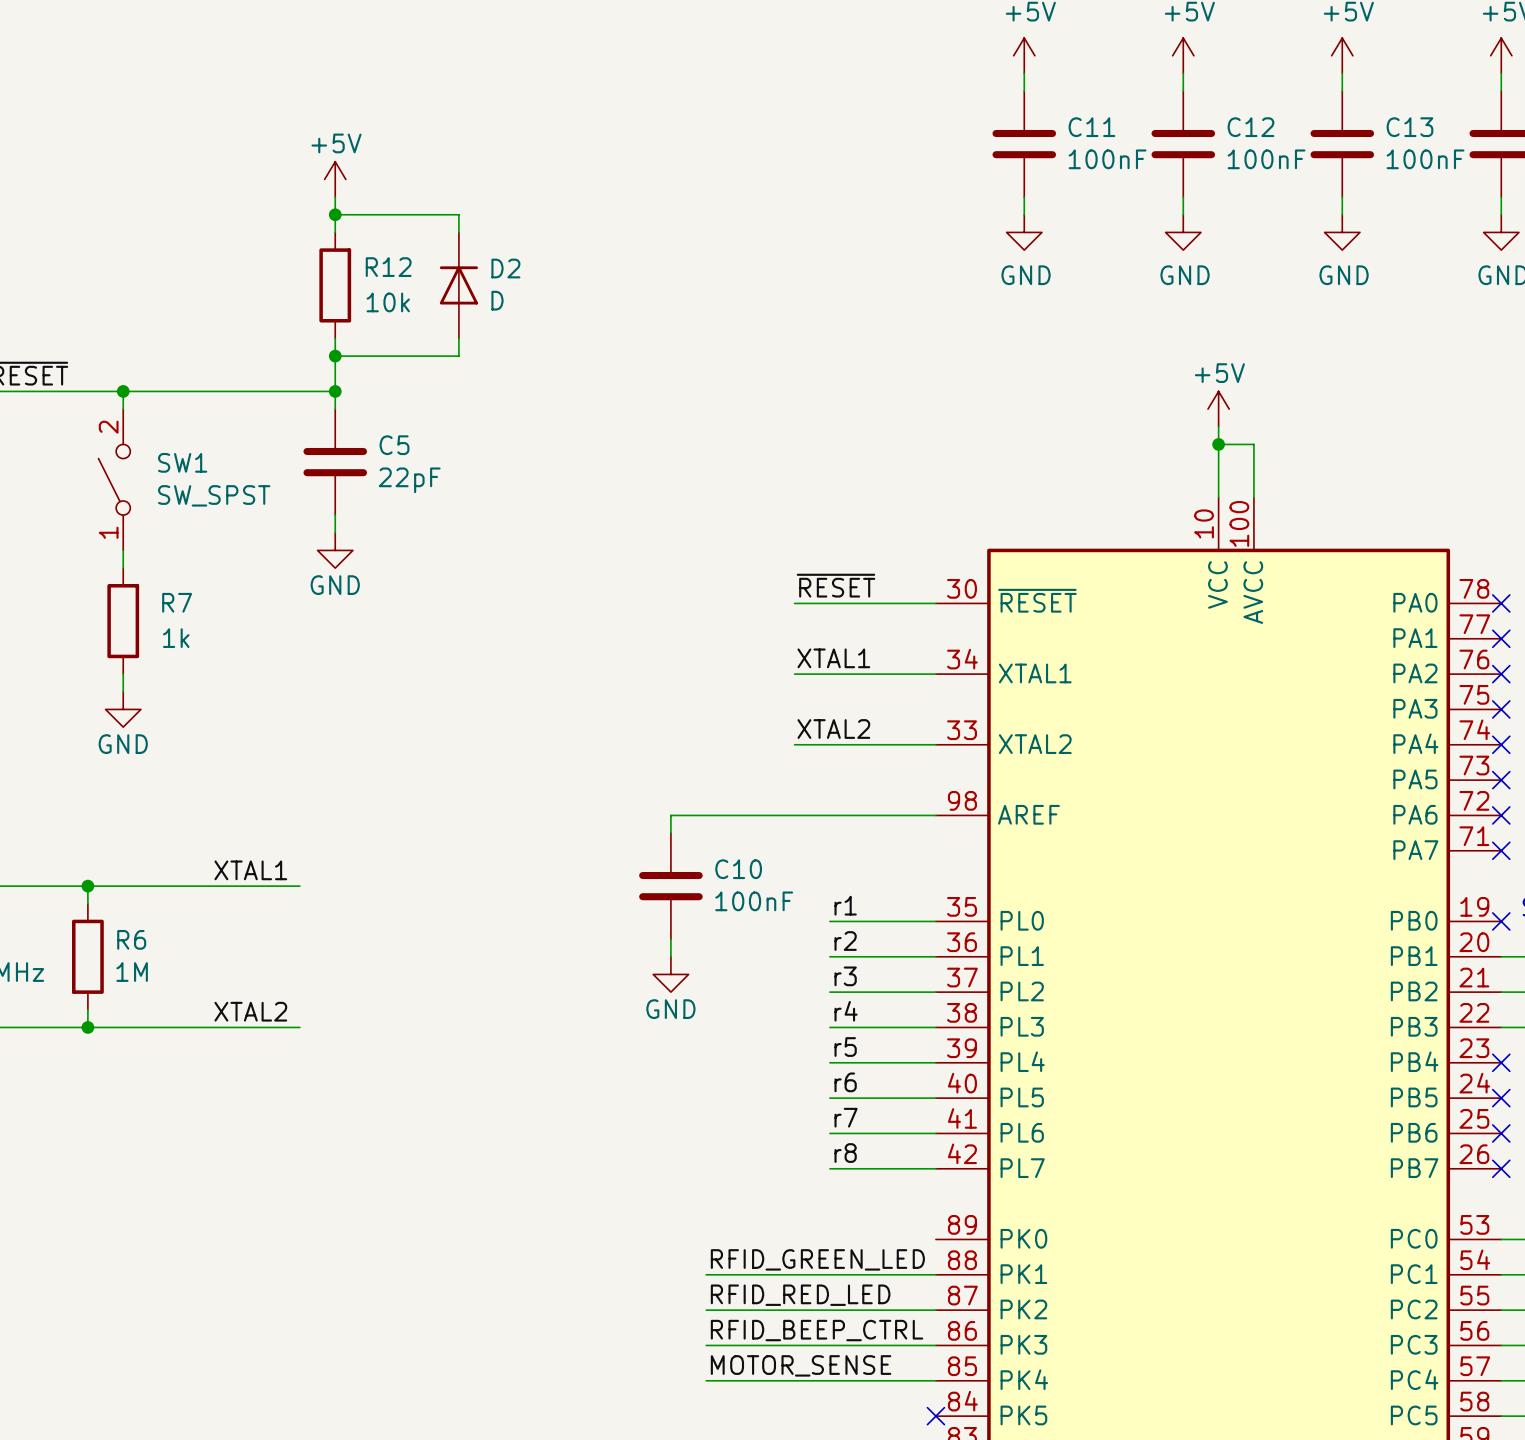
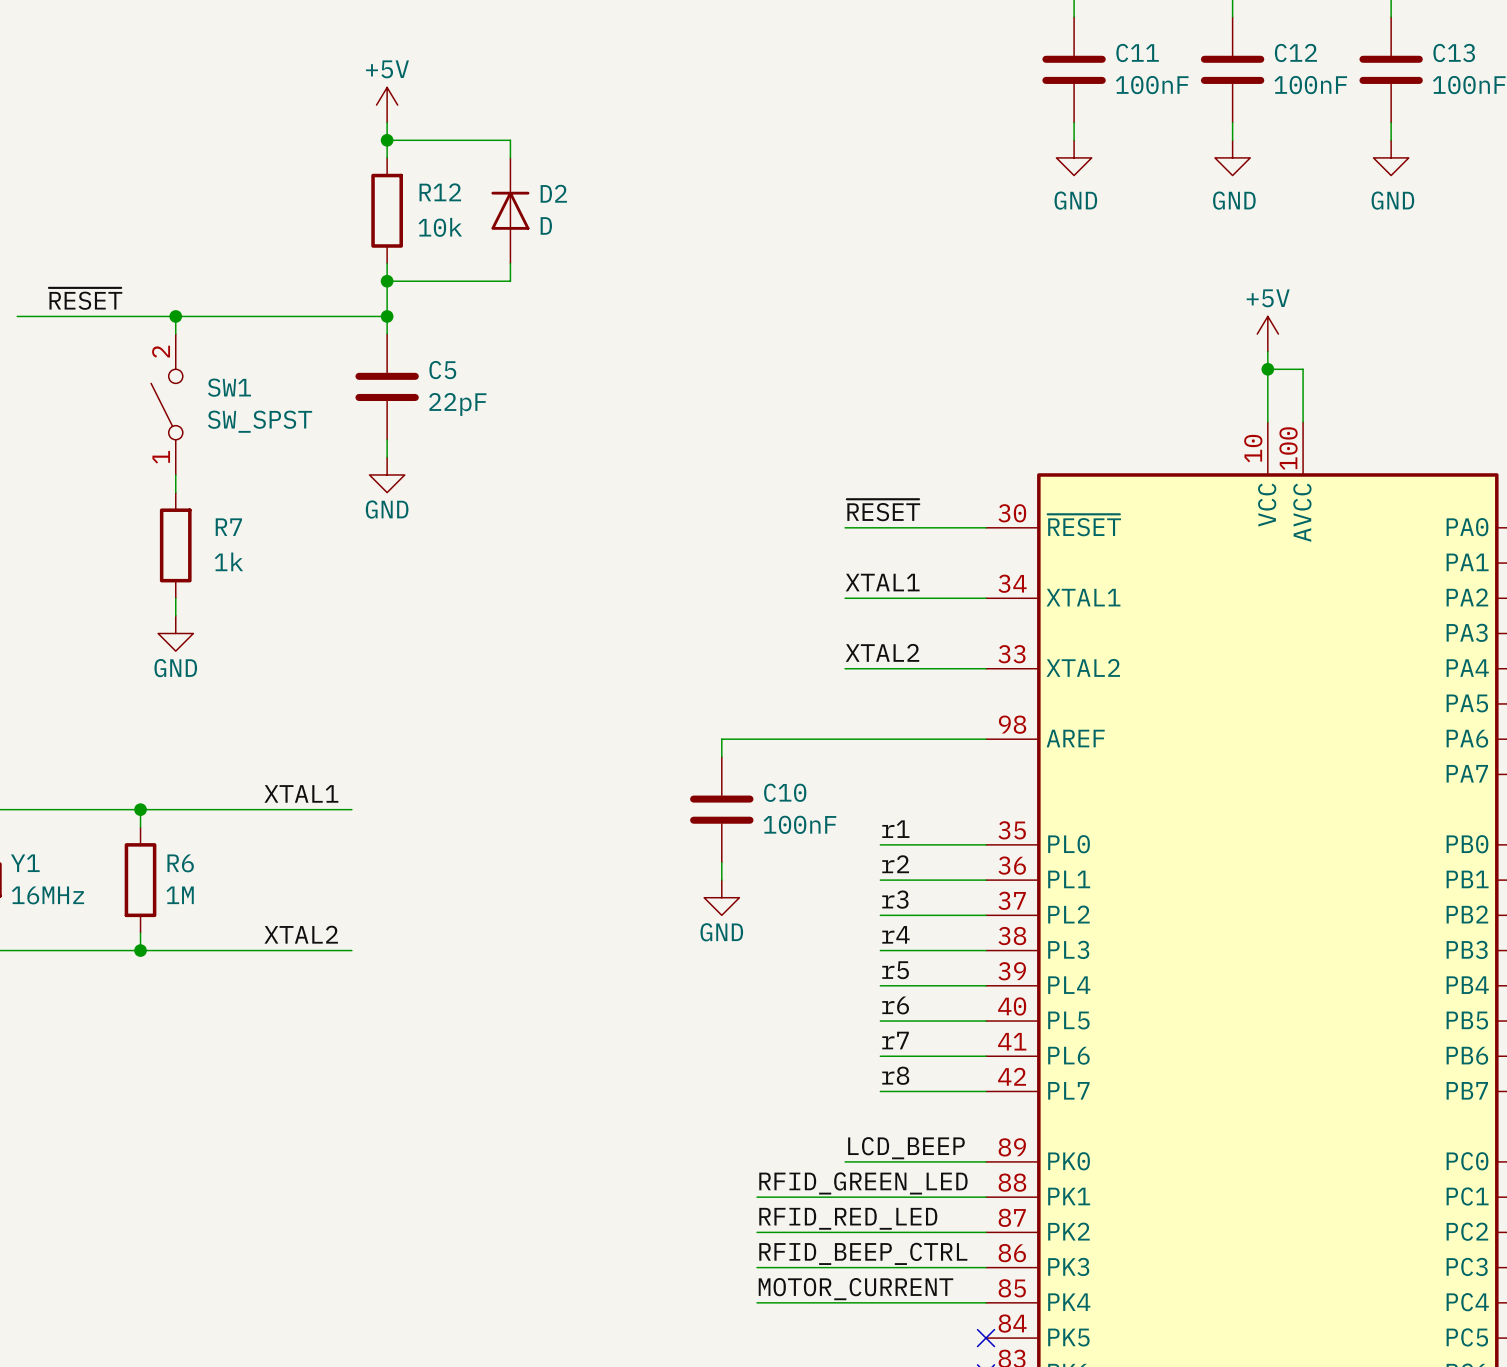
label: none -> LCD_BEEP (906, 1148)
wire: none -> (845, 1161) (986, 1161)
label: MOTOR_SENSE (801, 1365) -> MOTOR_CURRENT (855, 1289)

